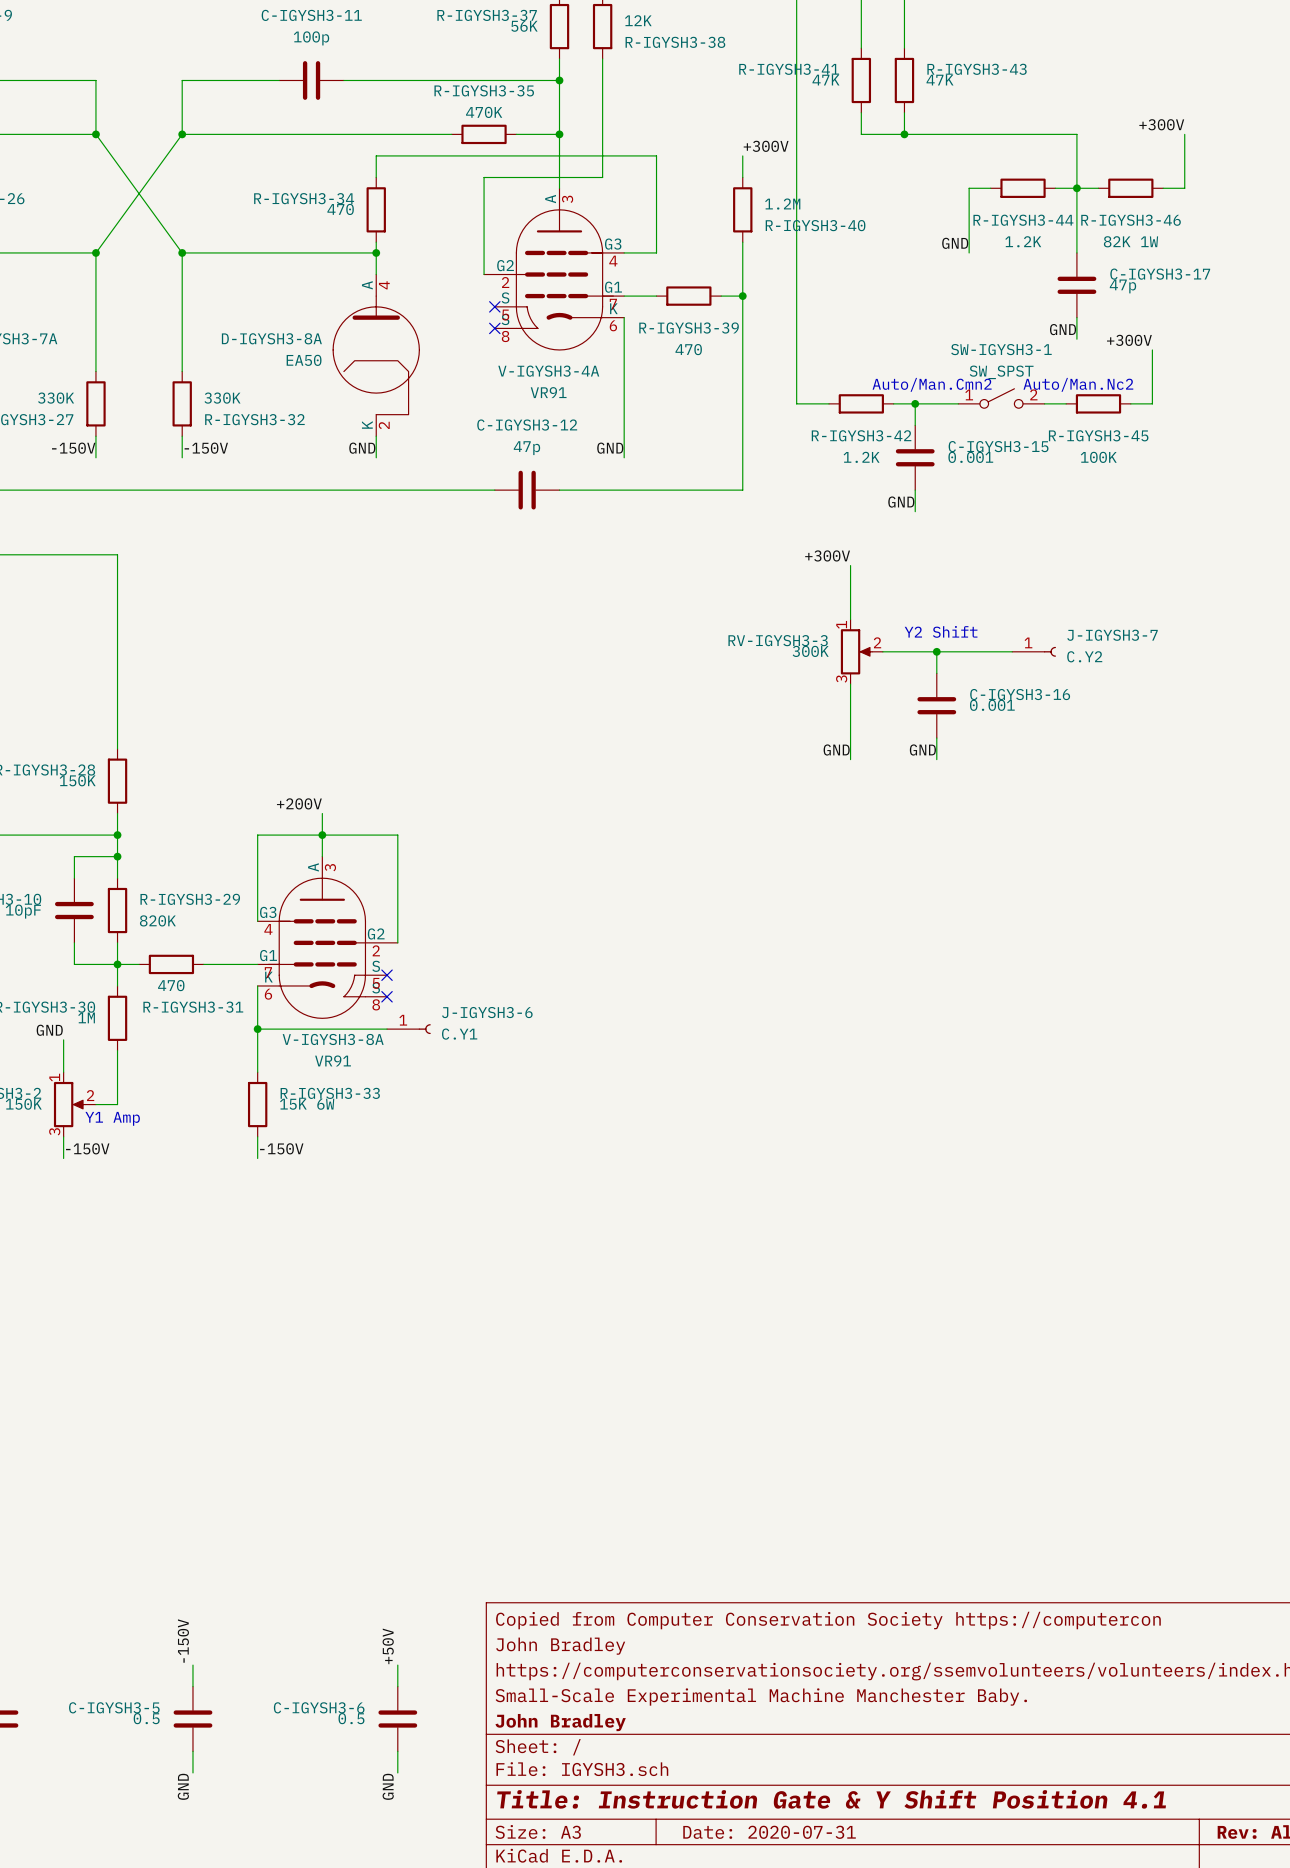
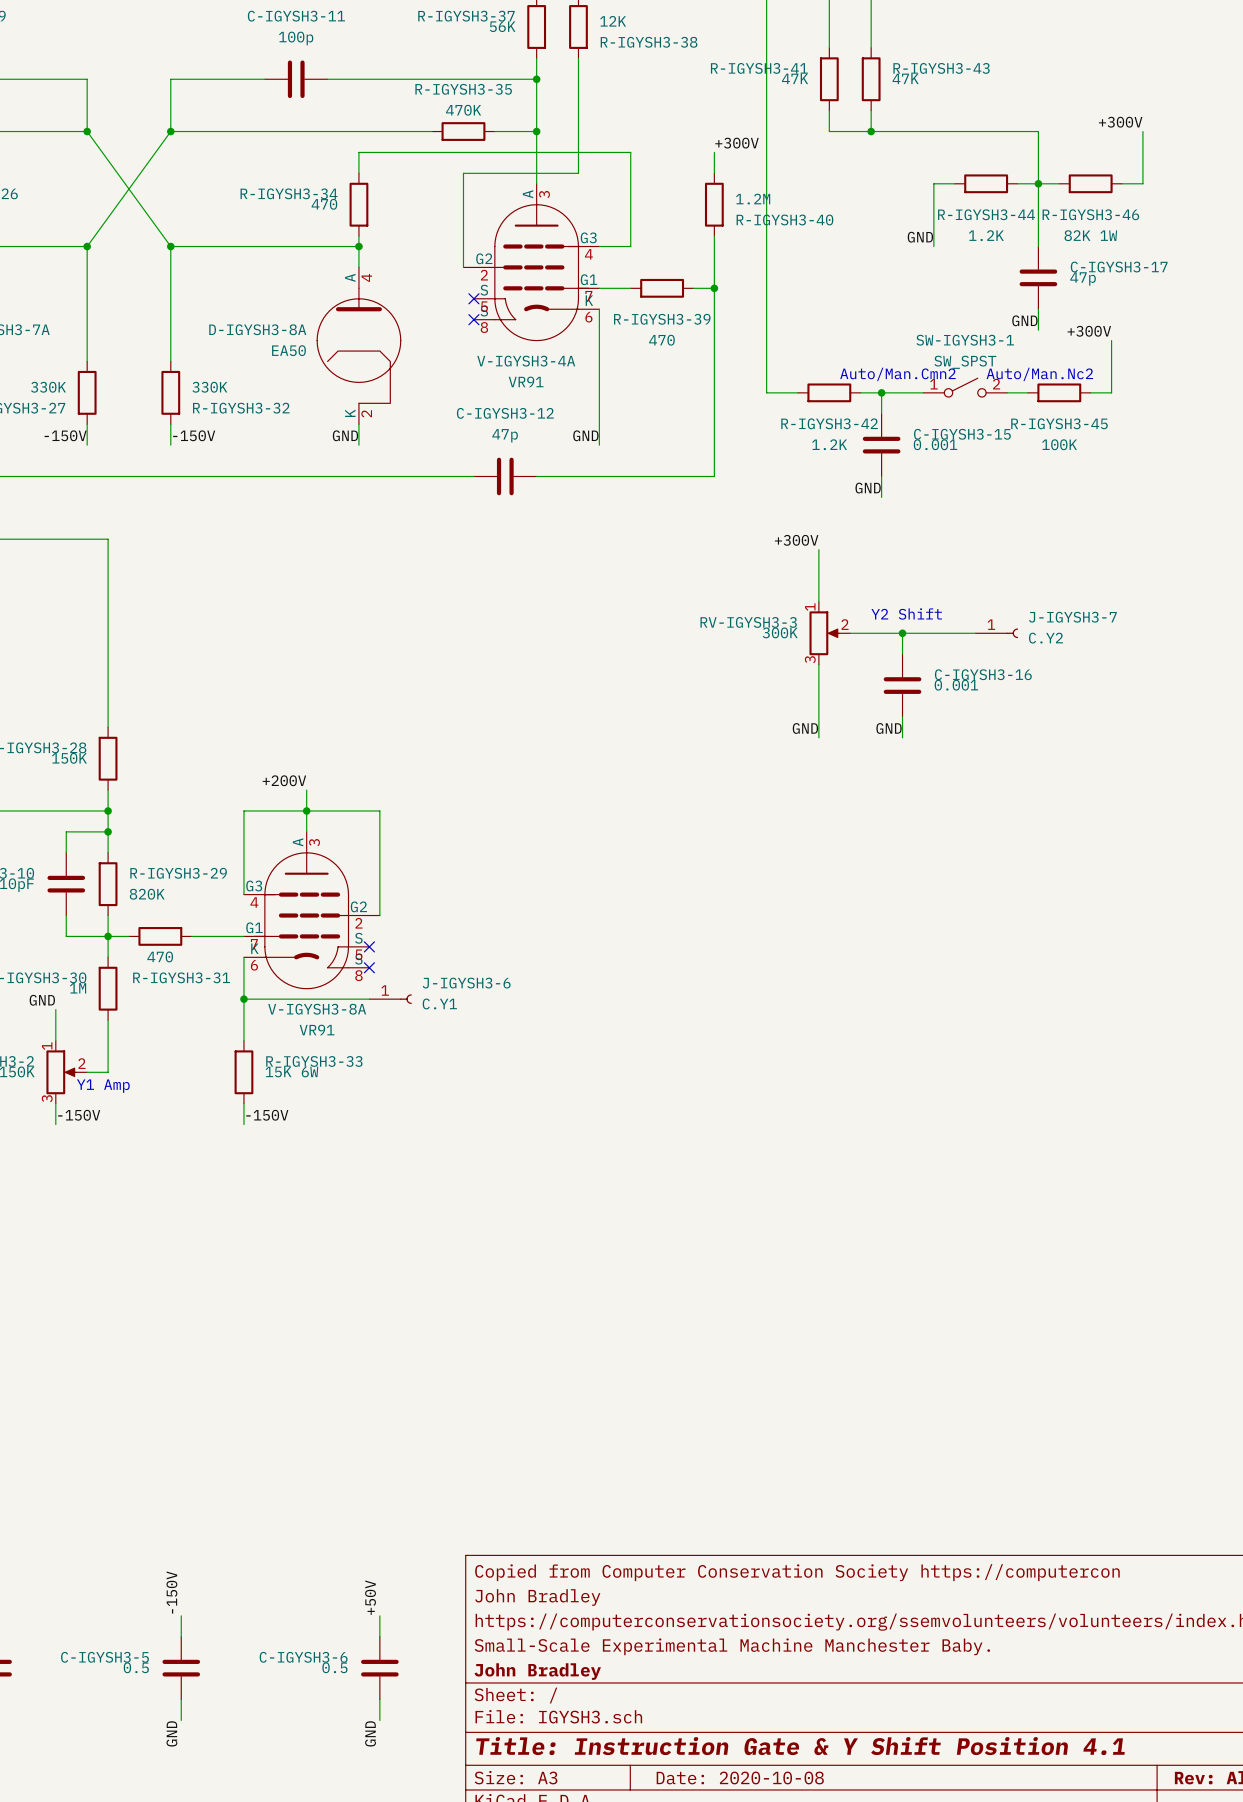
title block: Date: 2020-07-31 (769, 1832) -> Date: 2020-10-08 (740, 1778)

